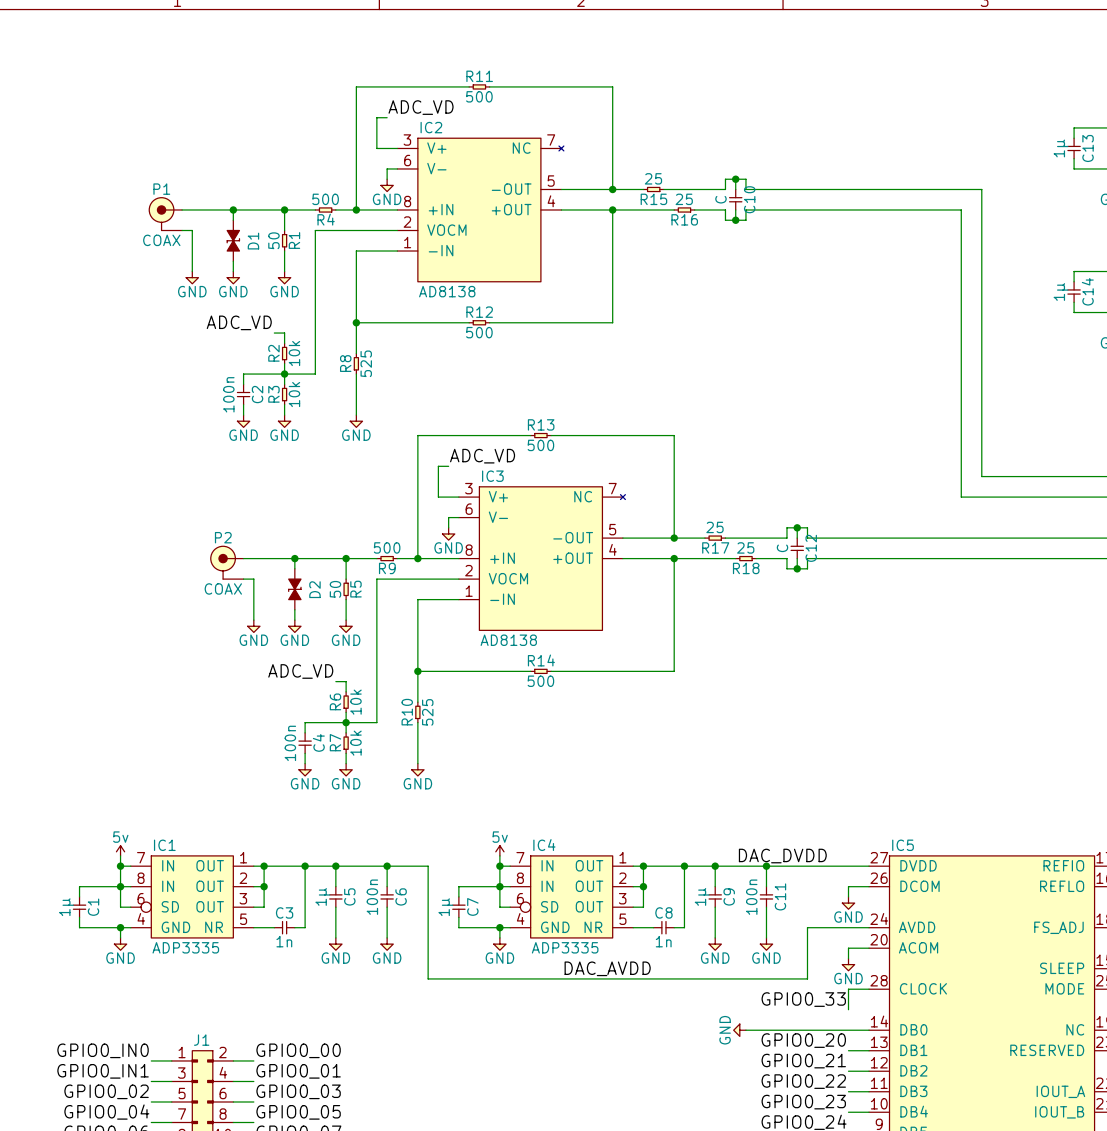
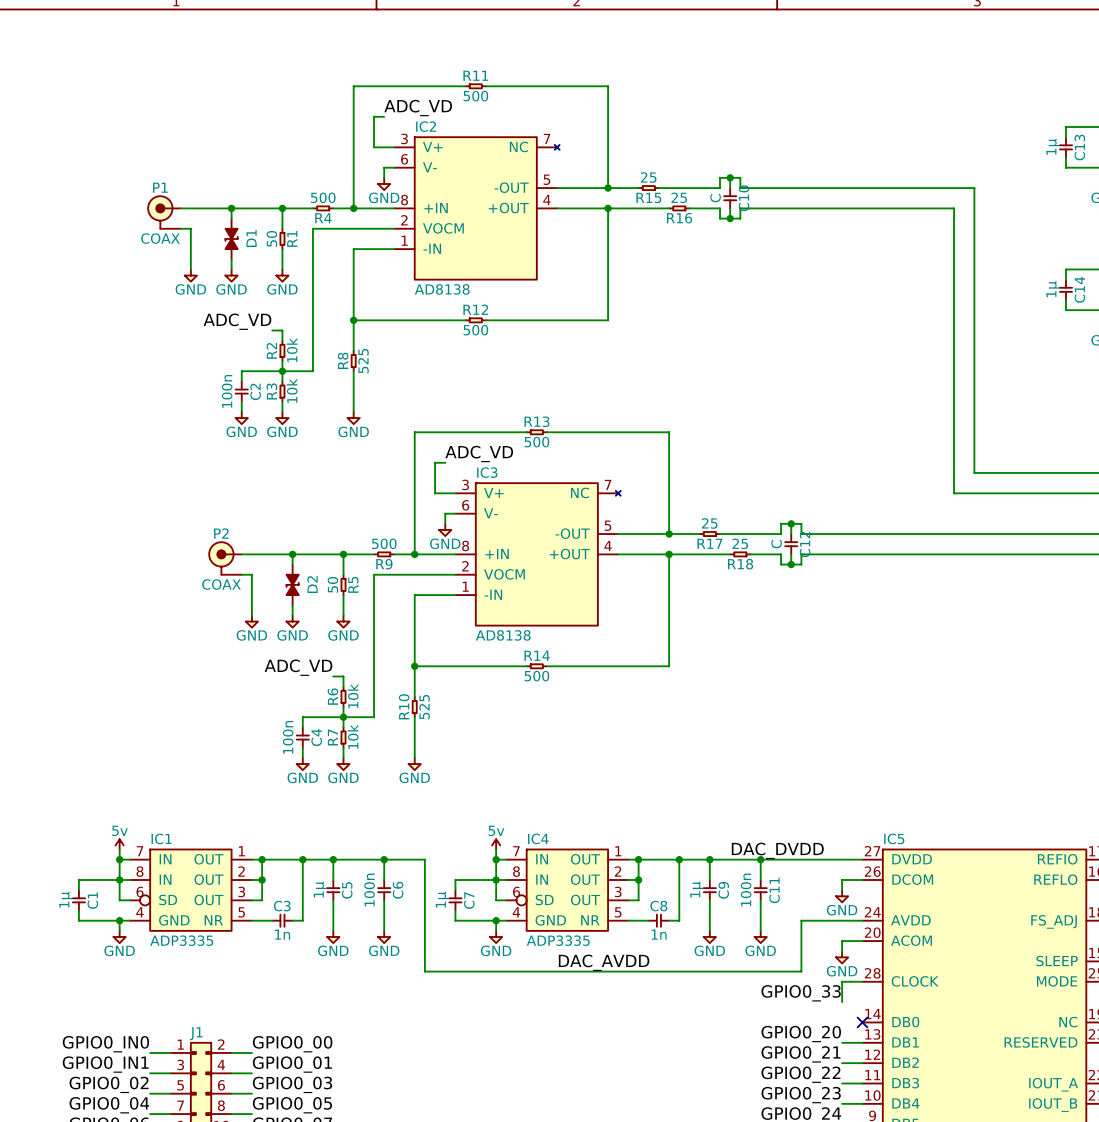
power symbol: GND (739, 1030) -> none
wire: (745, 1030) (869, 1030) -> none
no-connect mark: none -> (862, 1022)

